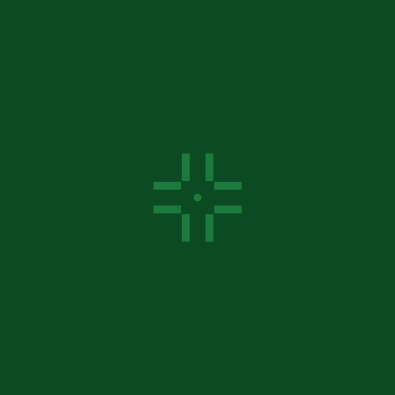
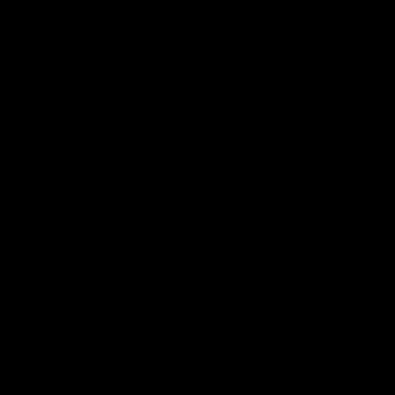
drawing: [153, 153, 242, 242] -> none

